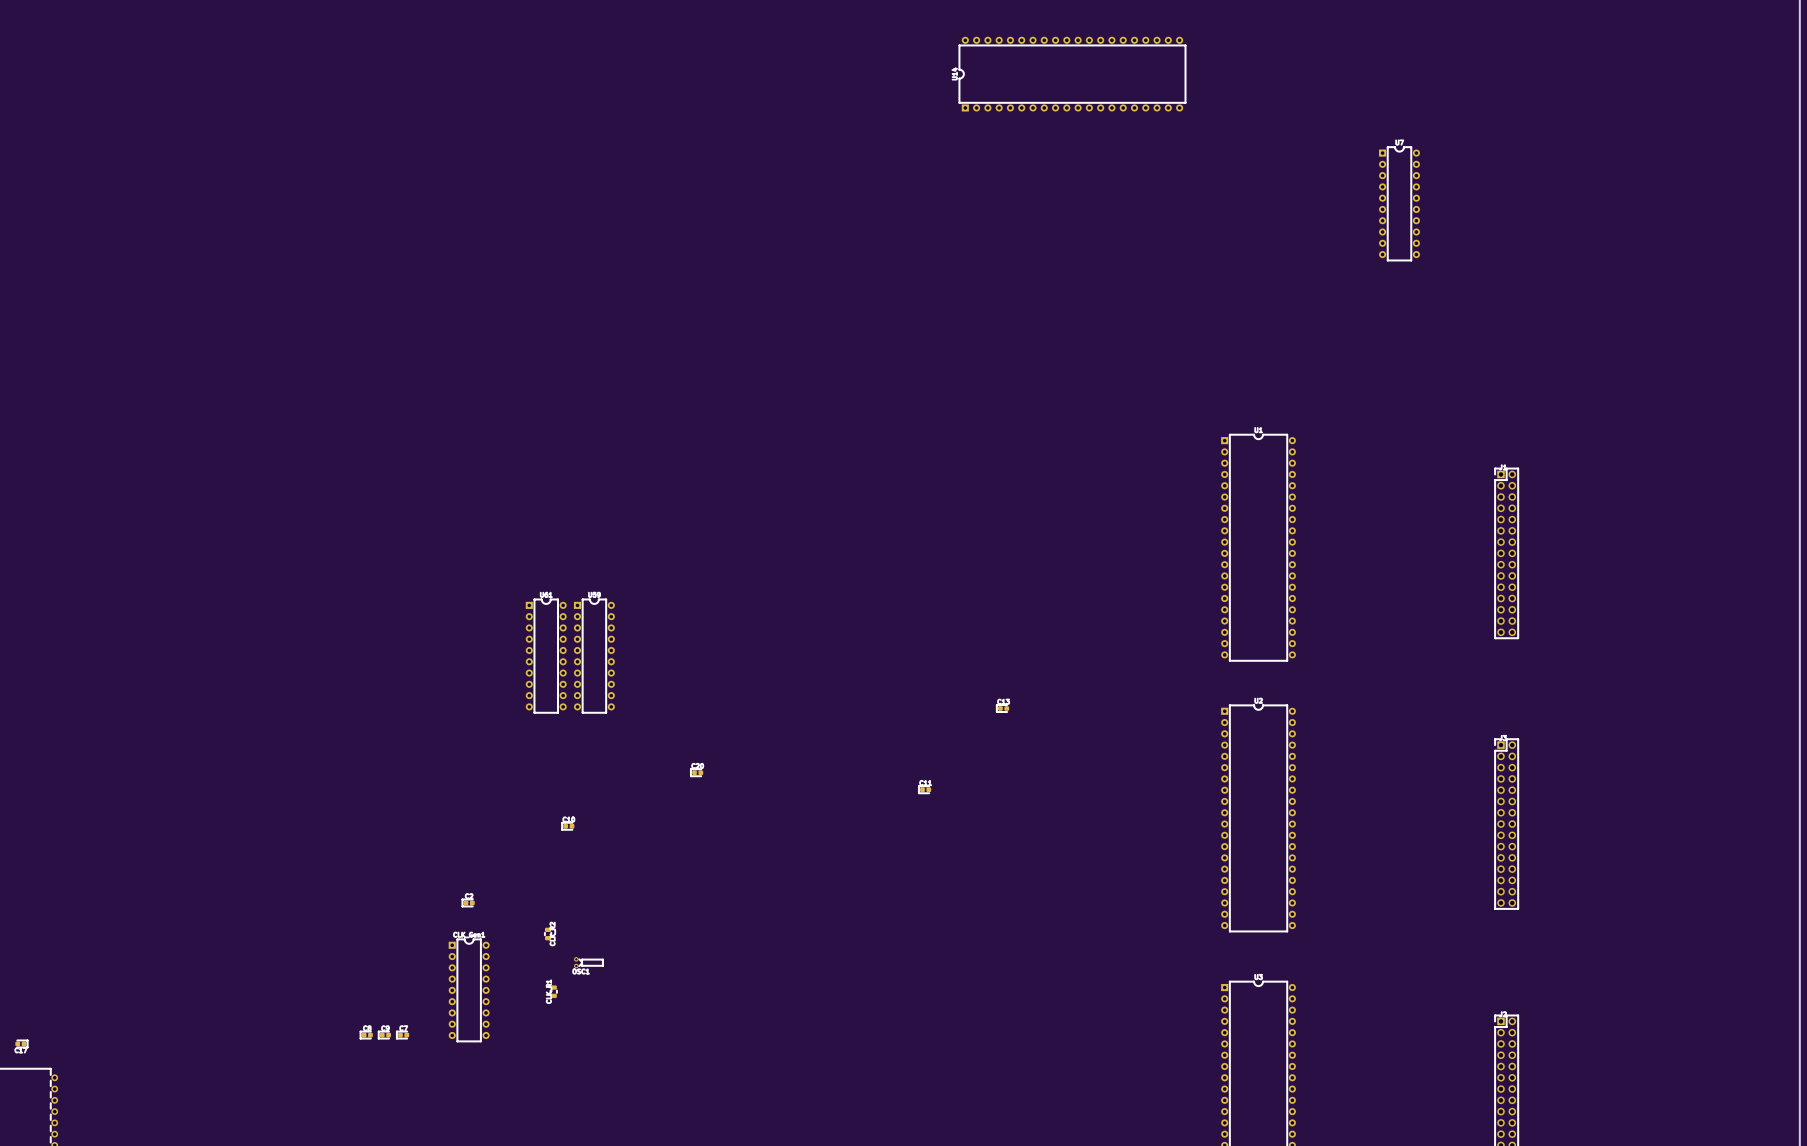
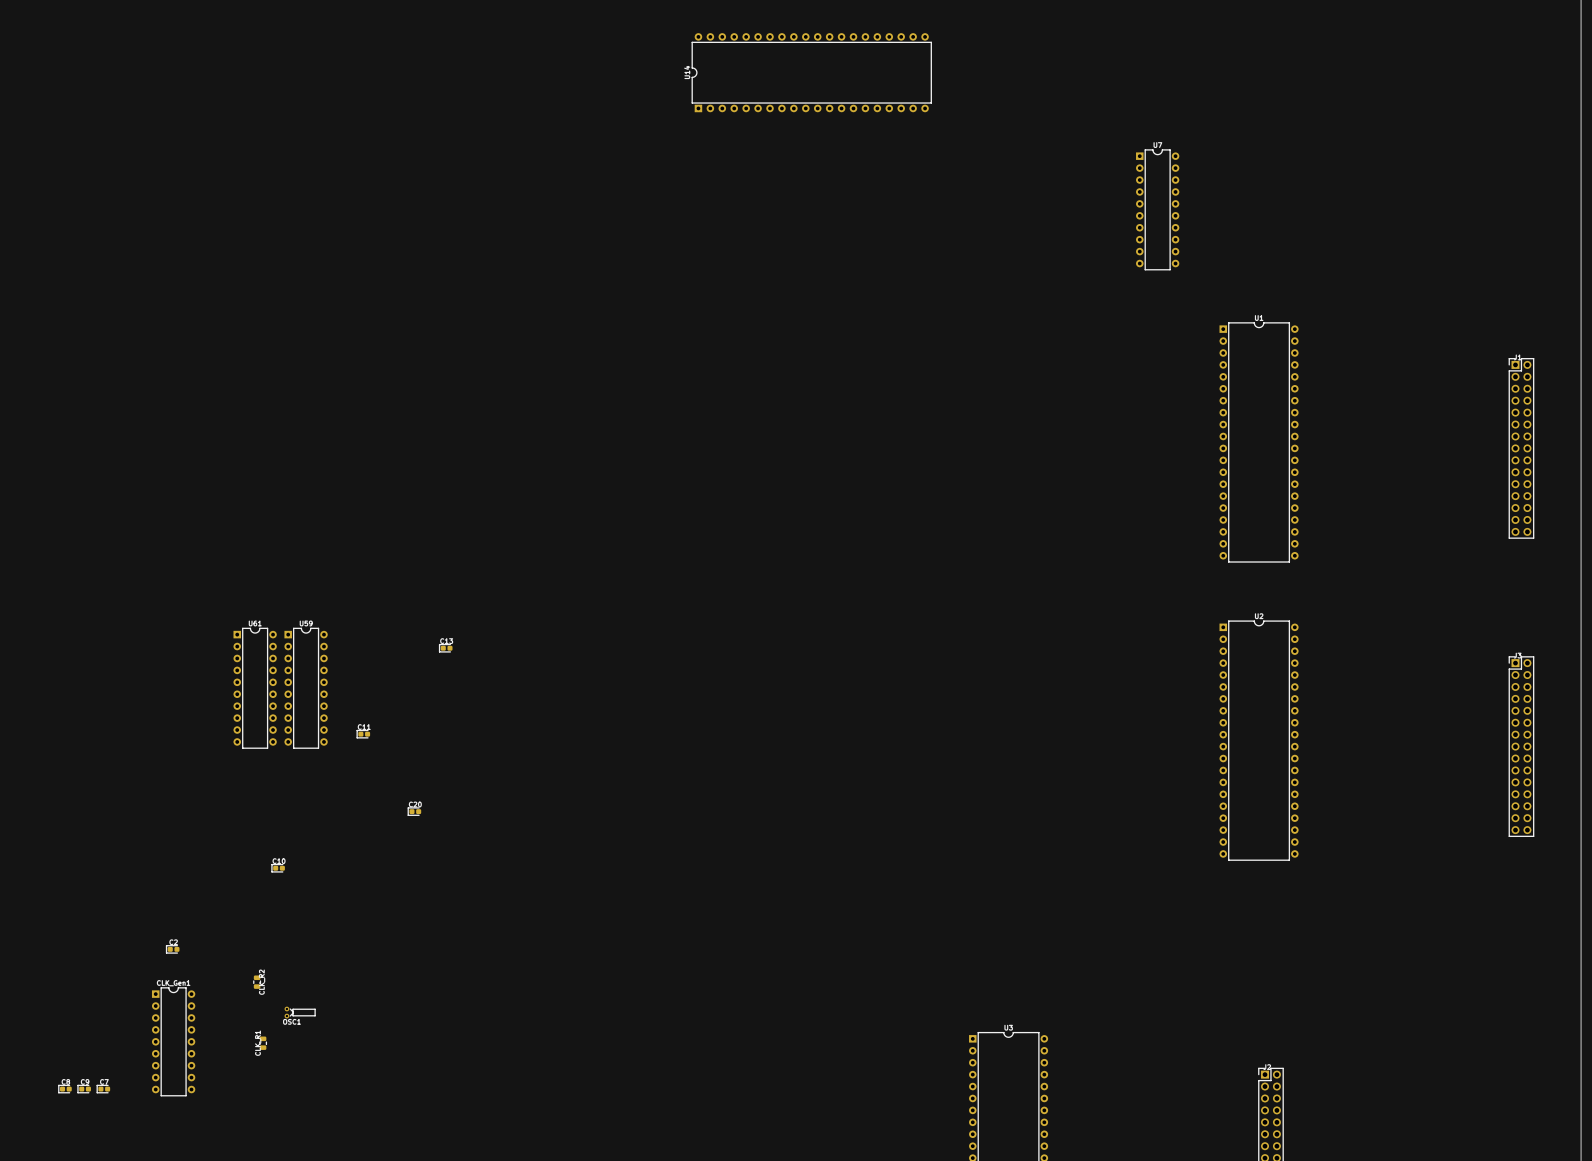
part position: (1258, 547) -> (1259, 442)
part position: (1506, 553) -> (1521, 448)
part position: (1002, 708) -> (445, 648)
part position: (924, 789) -> (363, 734)
part position: (1258, 818) -> (1259, 740)
part position: (1506, 824) -> (1521, 746)

